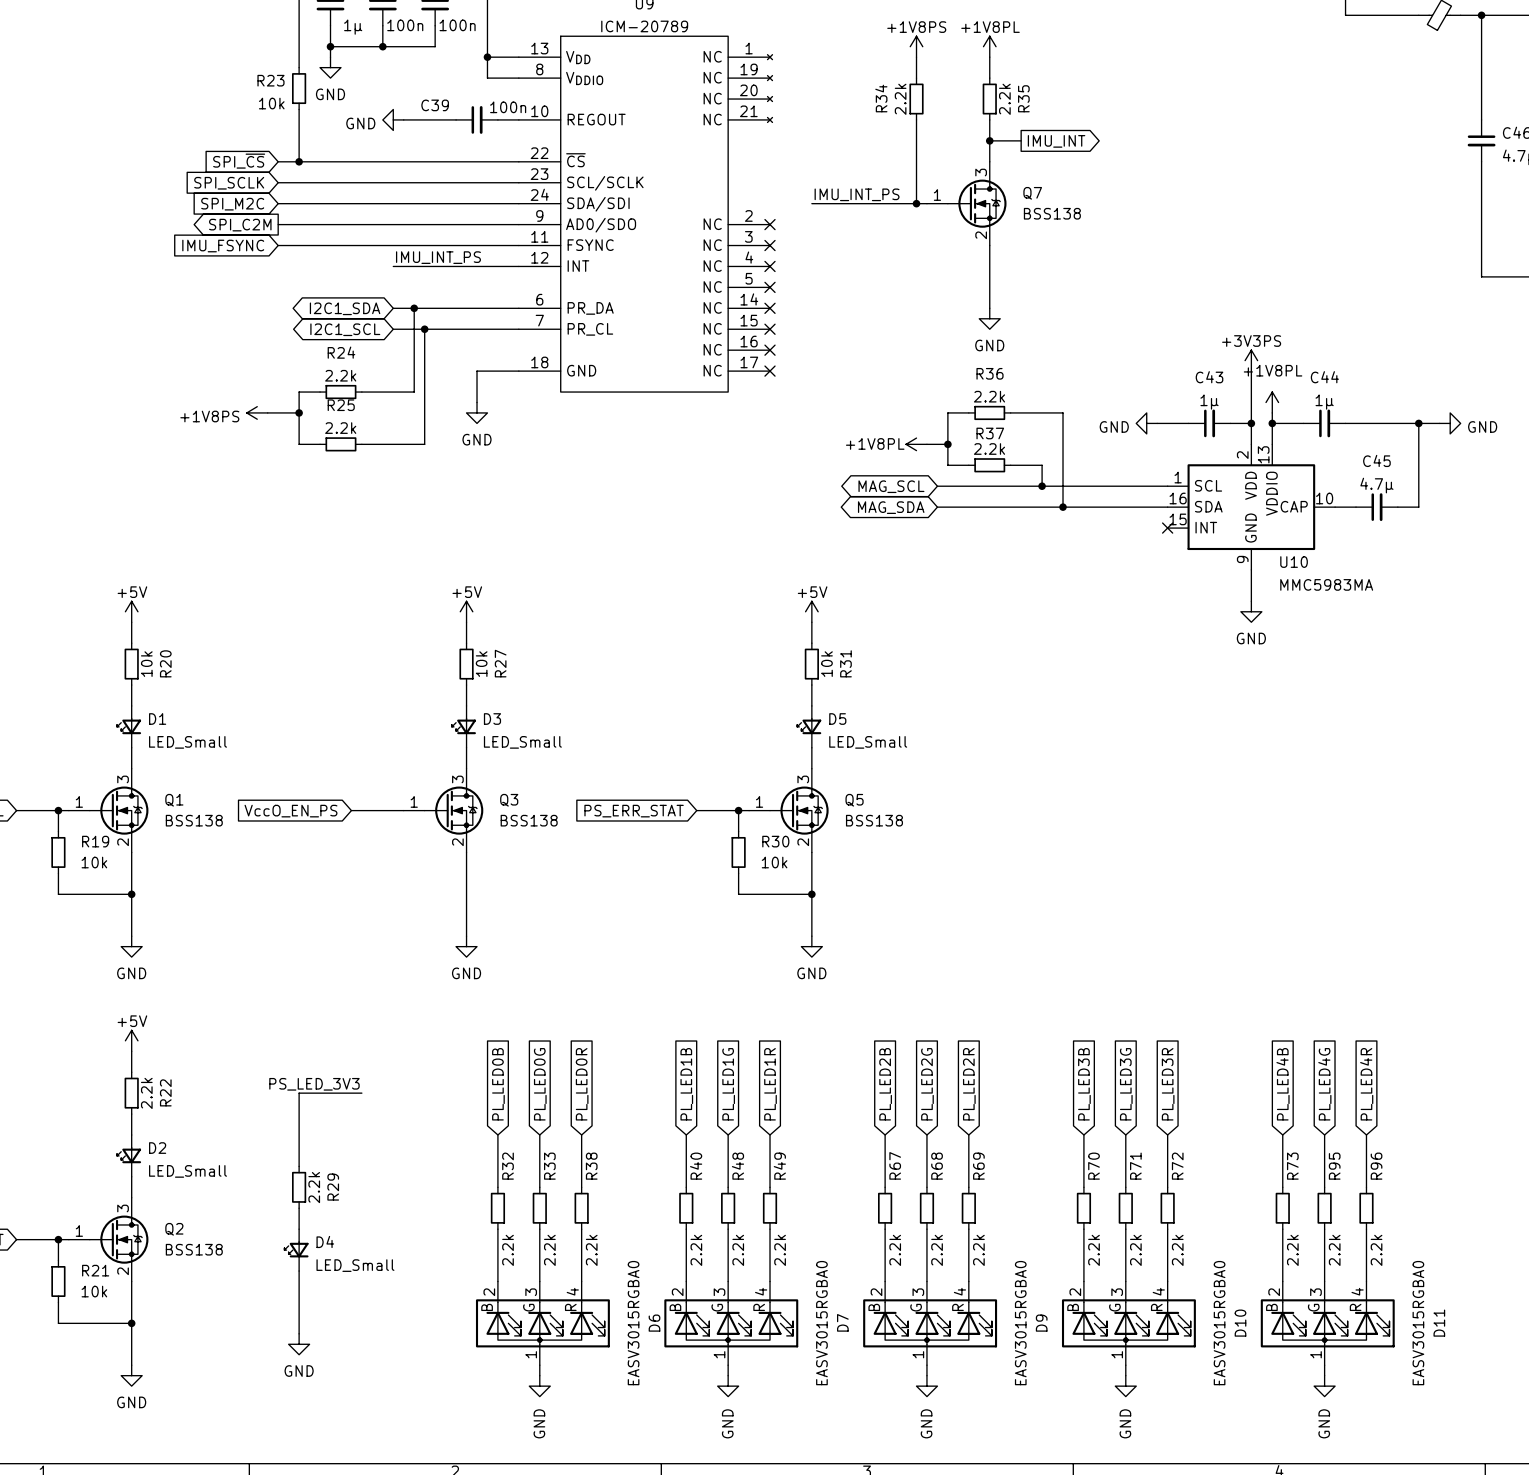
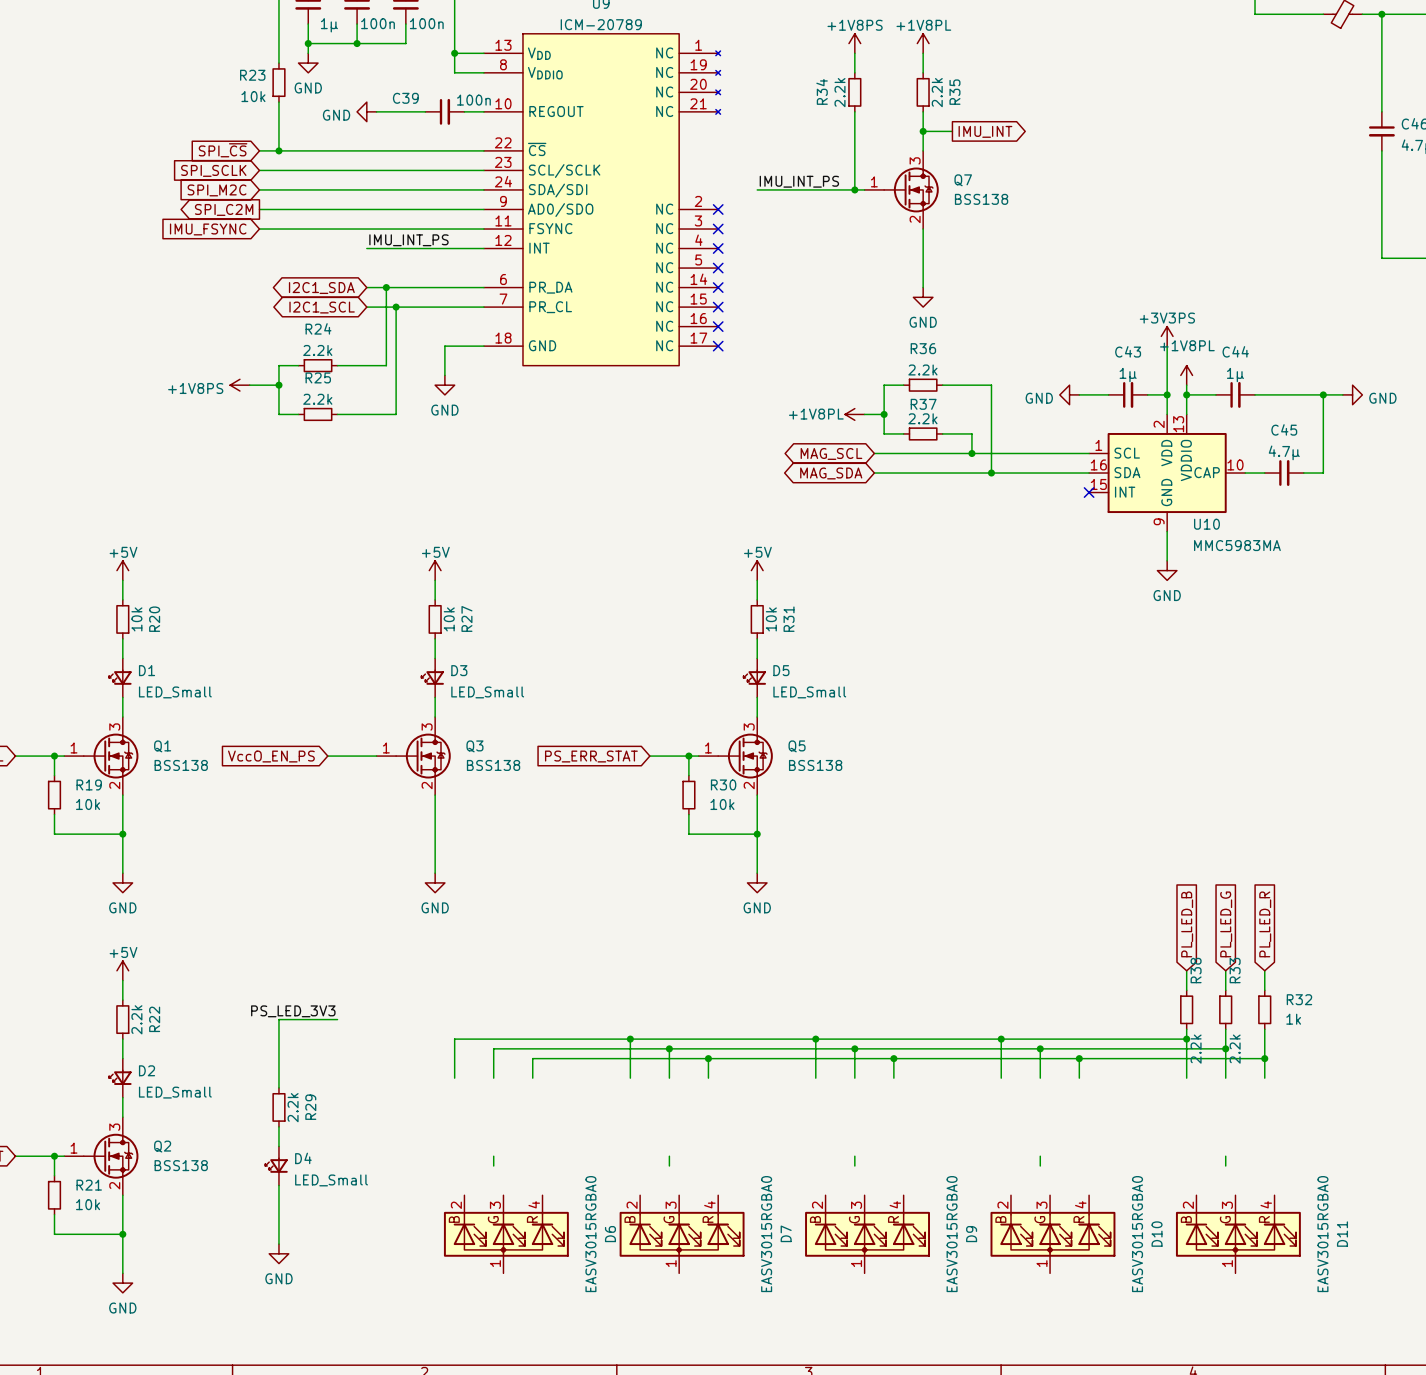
global label: PL_LED0B (498, 1084) -> none
global label: PL_LED0G (540, 1084) -> none
global label: PL_LED0R (582, 1084) -> none
global label: PL_LED1B (686, 1084) -> none
global label: PL_LED1G (728, 1084) -> none
global label: PL_LED1R (770, 1084) -> none
global label: PL_LED2B (885, 1084) -> none
global label: PL_LED2G (927, 1084) -> none
global label: PL_LED2R (969, 1084) -> none
global label: PL_LED3B (1084, 1084) -> none
global label: PL_LED3G (1126, 1084) -> none
global label: PL_LED3R (1168, 1084) -> none
global label: PL_LED4B (1283, 1084) -> PL_LED_B (1187, 924)
global label: PL_LED4G (1324, 1084) -> PL_LED_G (1226, 924)
global label: PL_LED4R (1366, 1084) -> PL_LED_R (1265, 924)
wire: none -> (630, 1039) (630, 1078)
junction: none -> (630, 1039)
wire: none -> (815, 1039) (815, 1078)
junction: none -> (815, 1039)
wire: none -> (1001, 1039) (1001, 1078)
junction: none -> (1001, 1039)
wire: none -> (1186, 1039) (454, 1039) (454, 1078)
junction: none -> (1186, 1039)
wire: none -> (669, 1048) (669, 1078)
junction: none -> (669, 1048)
wire: none -> (854, 1048) (854, 1078)
junction: none -> (854, 1048)
wire: none -> (1040, 1048) (1040, 1078)
junction: none -> (1040, 1048)
wire: none -> (1225, 1048) (493, 1048) (493, 1078)
junction: none -> (1225, 1048)
wire: (497, 1134) (497, 1187) -> none
wire: (539, 1134) (539, 1187) -> none
wire: (581, 1134) (581, 1187) -> none
wire: (686, 1134) (686, 1187) -> none
wire: (728, 1134) (728, 1187) -> none
wire: none -> (708, 1058) (708, 1078)
junction: none -> (708, 1058)
wire: (770, 1134) (770, 1187) -> none
wire: (885, 1134) (885, 1187) -> none
wire: (926, 1134) (926, 1187) -> none
wire: none -> (893, 1058) (893, 1078)
junction: none -> (893, 1058)
wire: (968, 1134) (968, 1187) -> none
wire: (1083, 1134) (1083, 1187) -> none
wire: (1125, 1134) (1125, 1187) -> none
wire: none -> (1079, 1058) (1079, 1078)
junction: none -> (1079, 1058)
wire: (1167, 1134) (1167, 1187) -> none
wire: (1282, 1134) (1282, 1187) -> none
wire: (1324, 1134) (1324, 1187) -> none
wire: none -> (1264, 1058) (532, 1058) (532, 1078)
junction: none -> (1264, 1058)
wire: (1366, 1134) (1366, 1187) -> none
R32 name rotation: 0° (508, 1166) -> 90° clockwise (1299, 999)
R32 name position: R32 (508, 1166) -> R32 (1299, 999)
R32 position: (497, 1208) -> (1264, 1009)
R33 position: (539, 1208) -> (1225, 1009)
R38 position: (581, 1208) -> (1186, 1009)
R40: 2.2k (686, 1208) -> none
R48: 2.2k (728, 1208) -> none
R49: 2.2k (770, 1208) -> none
R67: 2.2k (885, 1208) -> none
R68: 2.2k (926, 1208) -> none
R69: 2.2k (968, 1208) -> none
R70: 2.2k (1083, 1208) -> none
R71: 2.2k (1125, 1208) -> none
R72: 2.2k (1167, 1208) -> none
R73: 2.2k (1282, 1208) -> none
R95: 2.2k (1324, 1208) -> none
R96: 2.2k (1366, 1208) -> none
wire: (497, 1229) (497, 1281) -> none
wire: (539, 1229) (539, 1281) -> none
wire: (581, 1229) (581, 1281) -> none
wire: (686, 1229) (686, 1281) -> none
wire: (728, 1229) (728, 1281) -> none
wire: (770, 1229) (770, 1281) -> none
wire: (885, 1229) (885, 1281) -> none
wire: (926, 1229) (926, 1281) -> none
wire: (968, 1229) (968, 1281) -> none
wire: (1083, 1229) (1083, 1281) -> none
wire: (1125, 1229) (1125, 1281) -> none
wire: (1167, 1229) (1167, 1281) -> none
wire: (1282, 1229) (1282, 1281) -> (1186, 1029) (1186, 1078)
wire: (1324, 1229) (1324, 1281) -> (1225, 1029) (1225, 1078)
wire: (1366, 1229) (1366, 1281) -> (1264, 1029) (1264, 1078)
R32 value: 2.2k (508, 1250) -> 1k (1293, 1019)
wire: (539, 1365) (539, 1375) -> (493, 1156) (493, 1165)
wire: (728, 1365) (728, 1375) -> (669, 1156) (669, 1165)
wire: (926, 1365) (926, 1375) -> (854, 1156) (854, 1165)
wire: (1125, 1365) (1125, 1375) -> (1040, 1156) (1040, 1165)
wire: (1324, 1365) (1324, 1375) -> (1225, 1156) (1225, 1165)
power symbol: GND (539, 1386) -> none
power symbol: GND (728, 1386) -> none
power symbol: GND (926, 1386) -> none
power symbol: GND (1125, 1386) -> none
power symbol: GND (1324, 1386) -> none

